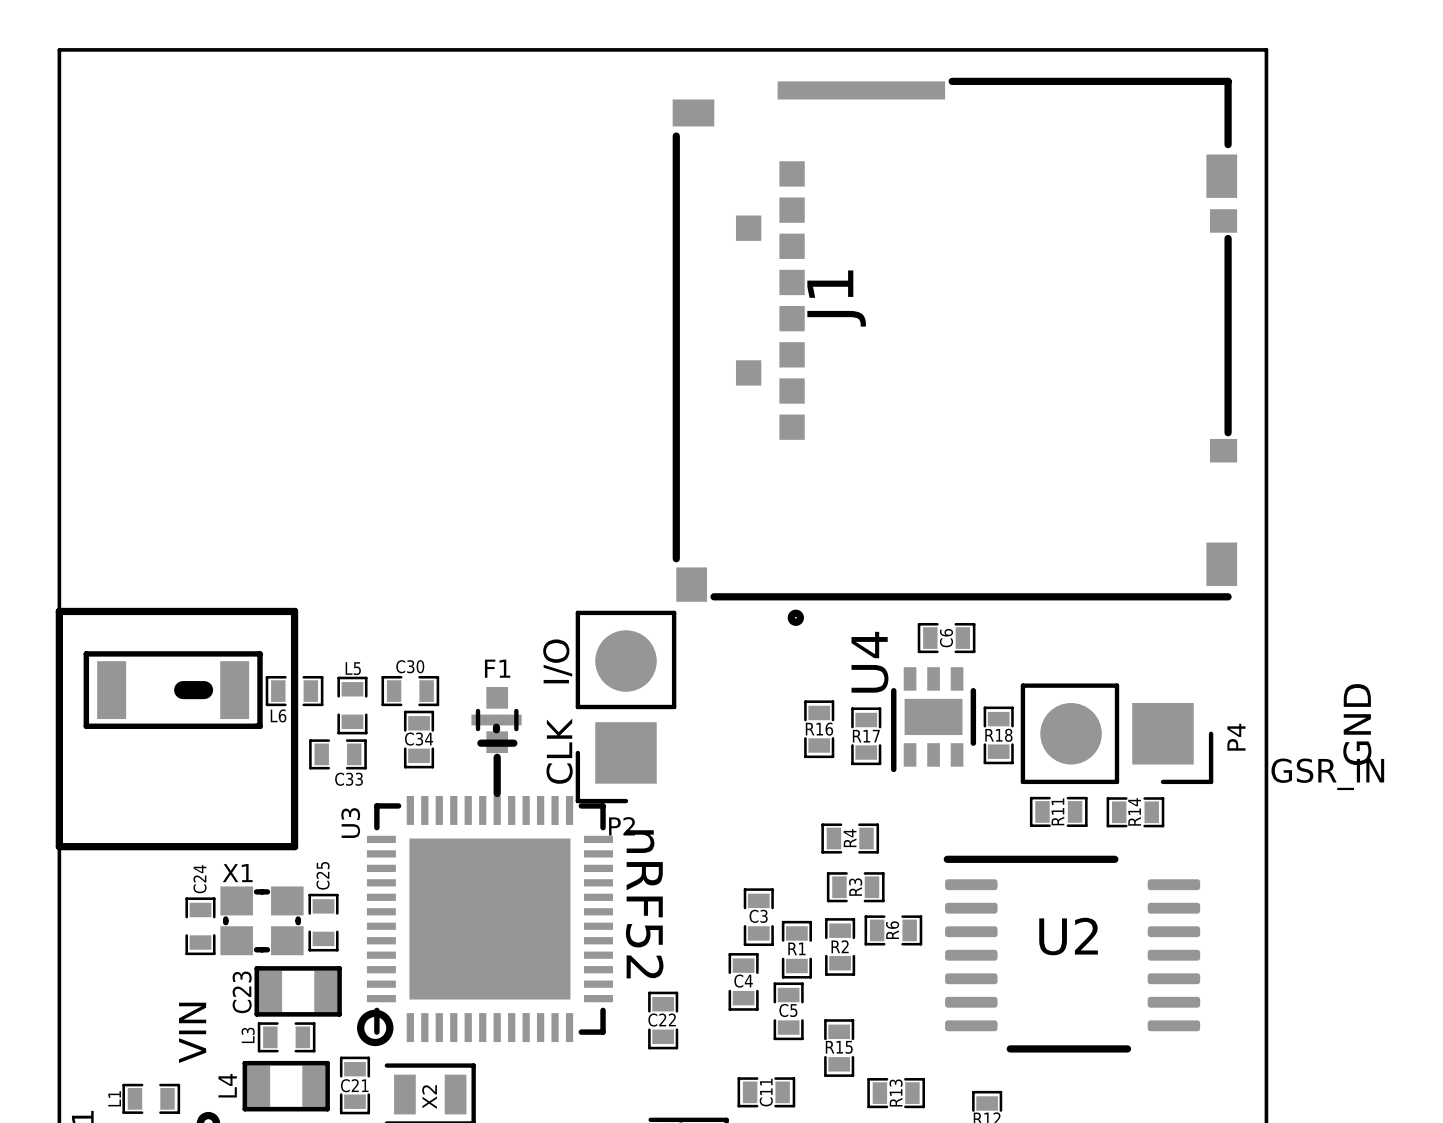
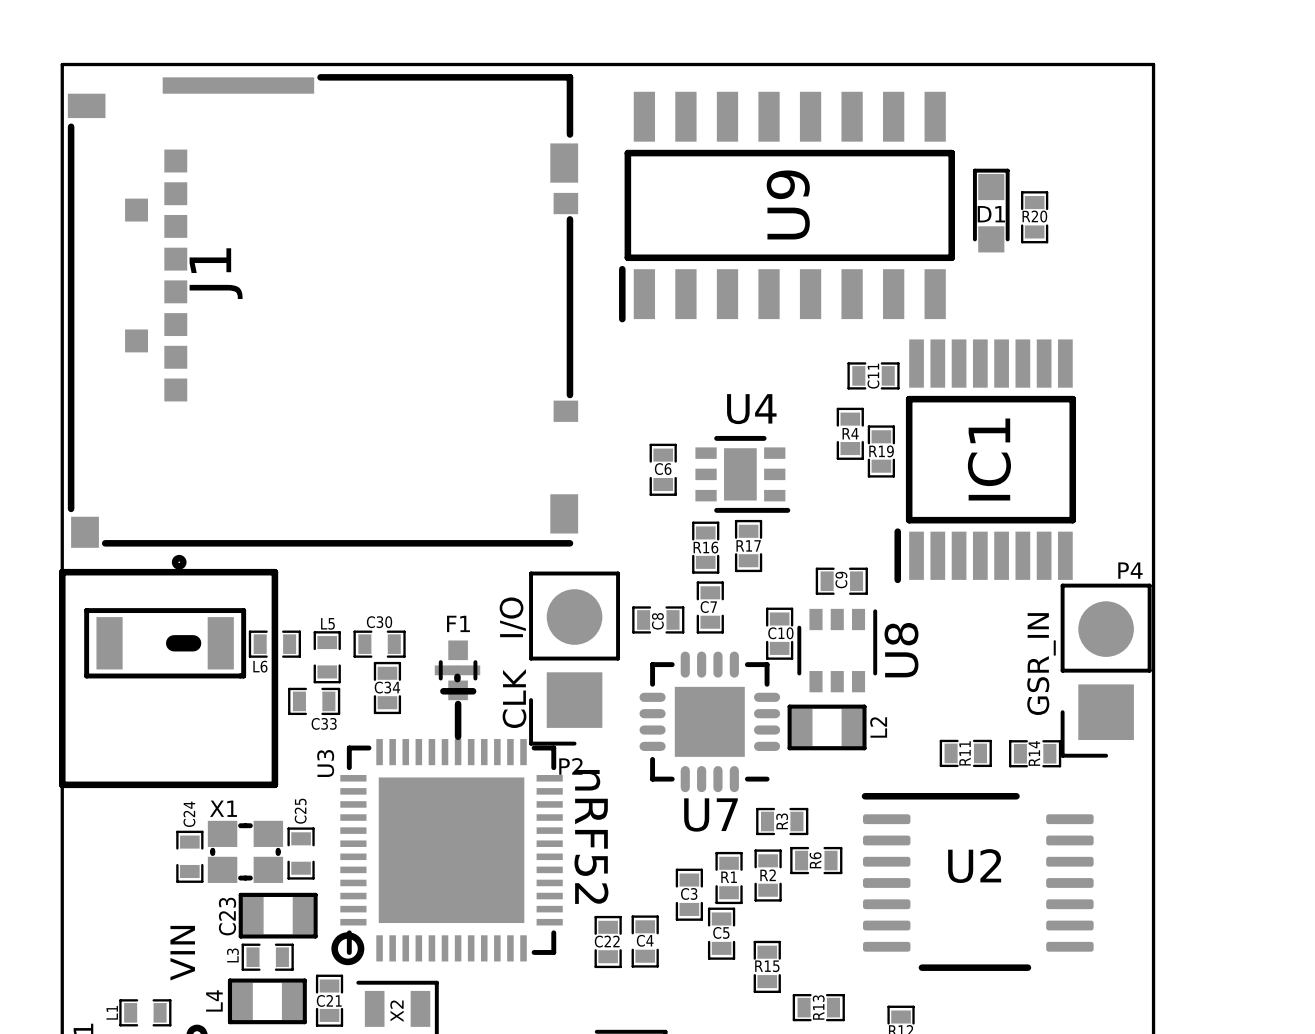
U9: none -> (787, 207)
D1: none -> (991, 210)
R20: none -> (1034, 217)
J1 position: (954, 351) -> (322, 321)
R19: none -> (881, 451)
IC1: none -> (985, 461)
C9: none -> (841, 581)
C6 rotation: 0° (946, 638) -> 90° clockwise (663, 469)
C6 position: (946, 638) -> (663, 469)
C7: none -> (710, 607)
U4 name position: U4 (869, 662) -> U4 (751, 409)
C8: none -> (658, 619)
C10: none -> (779, 633)
U8: none -> (837, 650)
U4 rotation: 0° (933, 719) -> 90° counterclockwise (742, 474)
U4 position: (933, 719) -> (742, 474)
text: GND (1357, 724) -> none
R16 position: (819, 729) -> (705, 547)
P4 rotation: 0° (1117, 733) -> 90° clockwise (1106, 670)
R18: (998, 735) -> none
R17 position: (866, 736) -> (748, 546)
P4 name position: P4 (1236, 737) -> P4 (1130, 570)
text rotation: 0° (1327, 774) -> 90° counterclockwise (1041, 664)
text position: GSR_IN (1327, 774) -> GSR_IN (1041, 664)
U7: none -> (709, 721)
L2: none -> (827, 727)
R4 rotation: 0° (850, 838) -> 90° clockwise (850, 433)
R4 position: (850, 838) -> (850, 433)
C3 position: (758, 917) -> (689, 894)
C4 position: (743, 981) -> (645, 941)
C11 position: (766, 1092) -> (873, 375)

